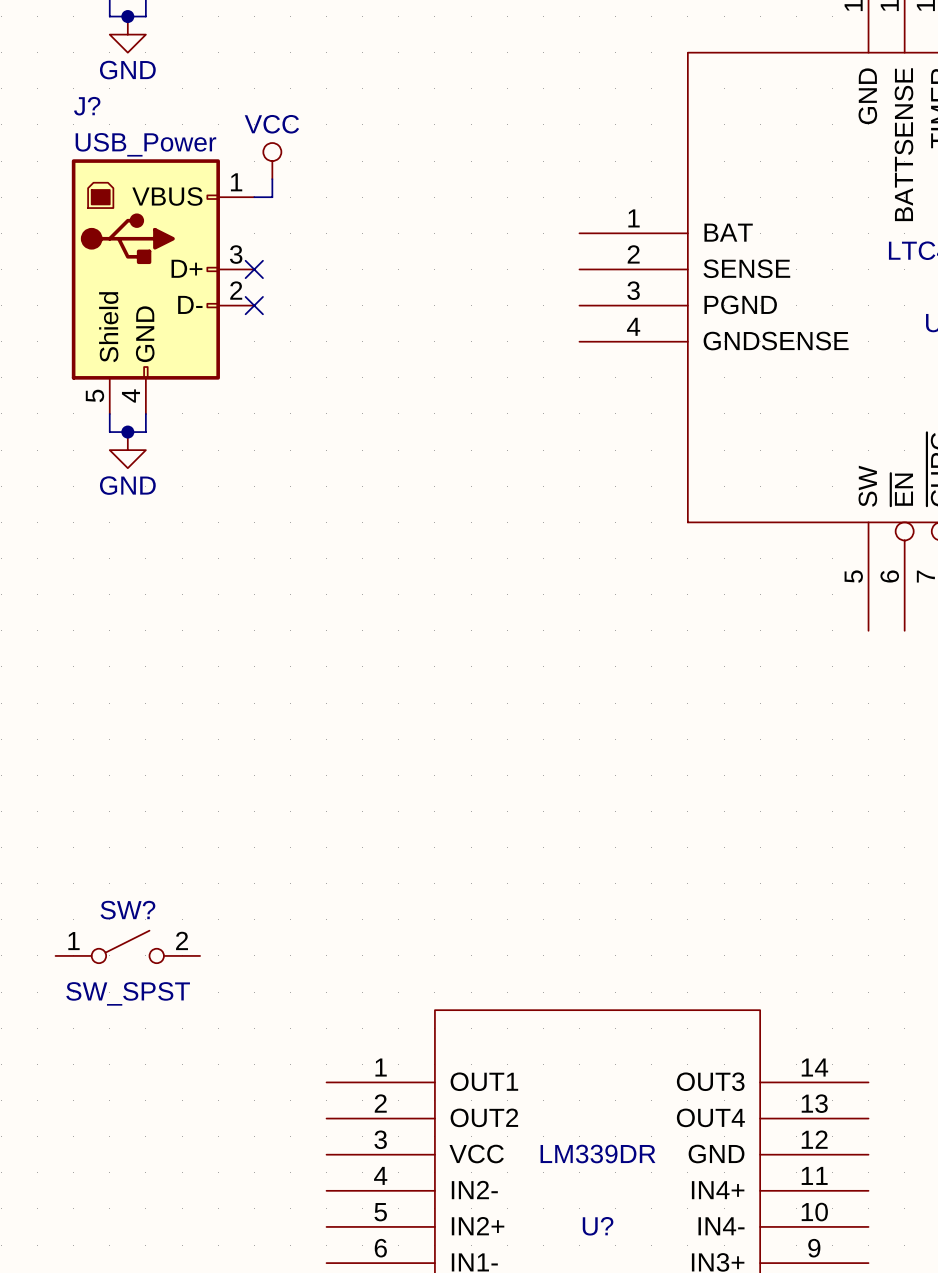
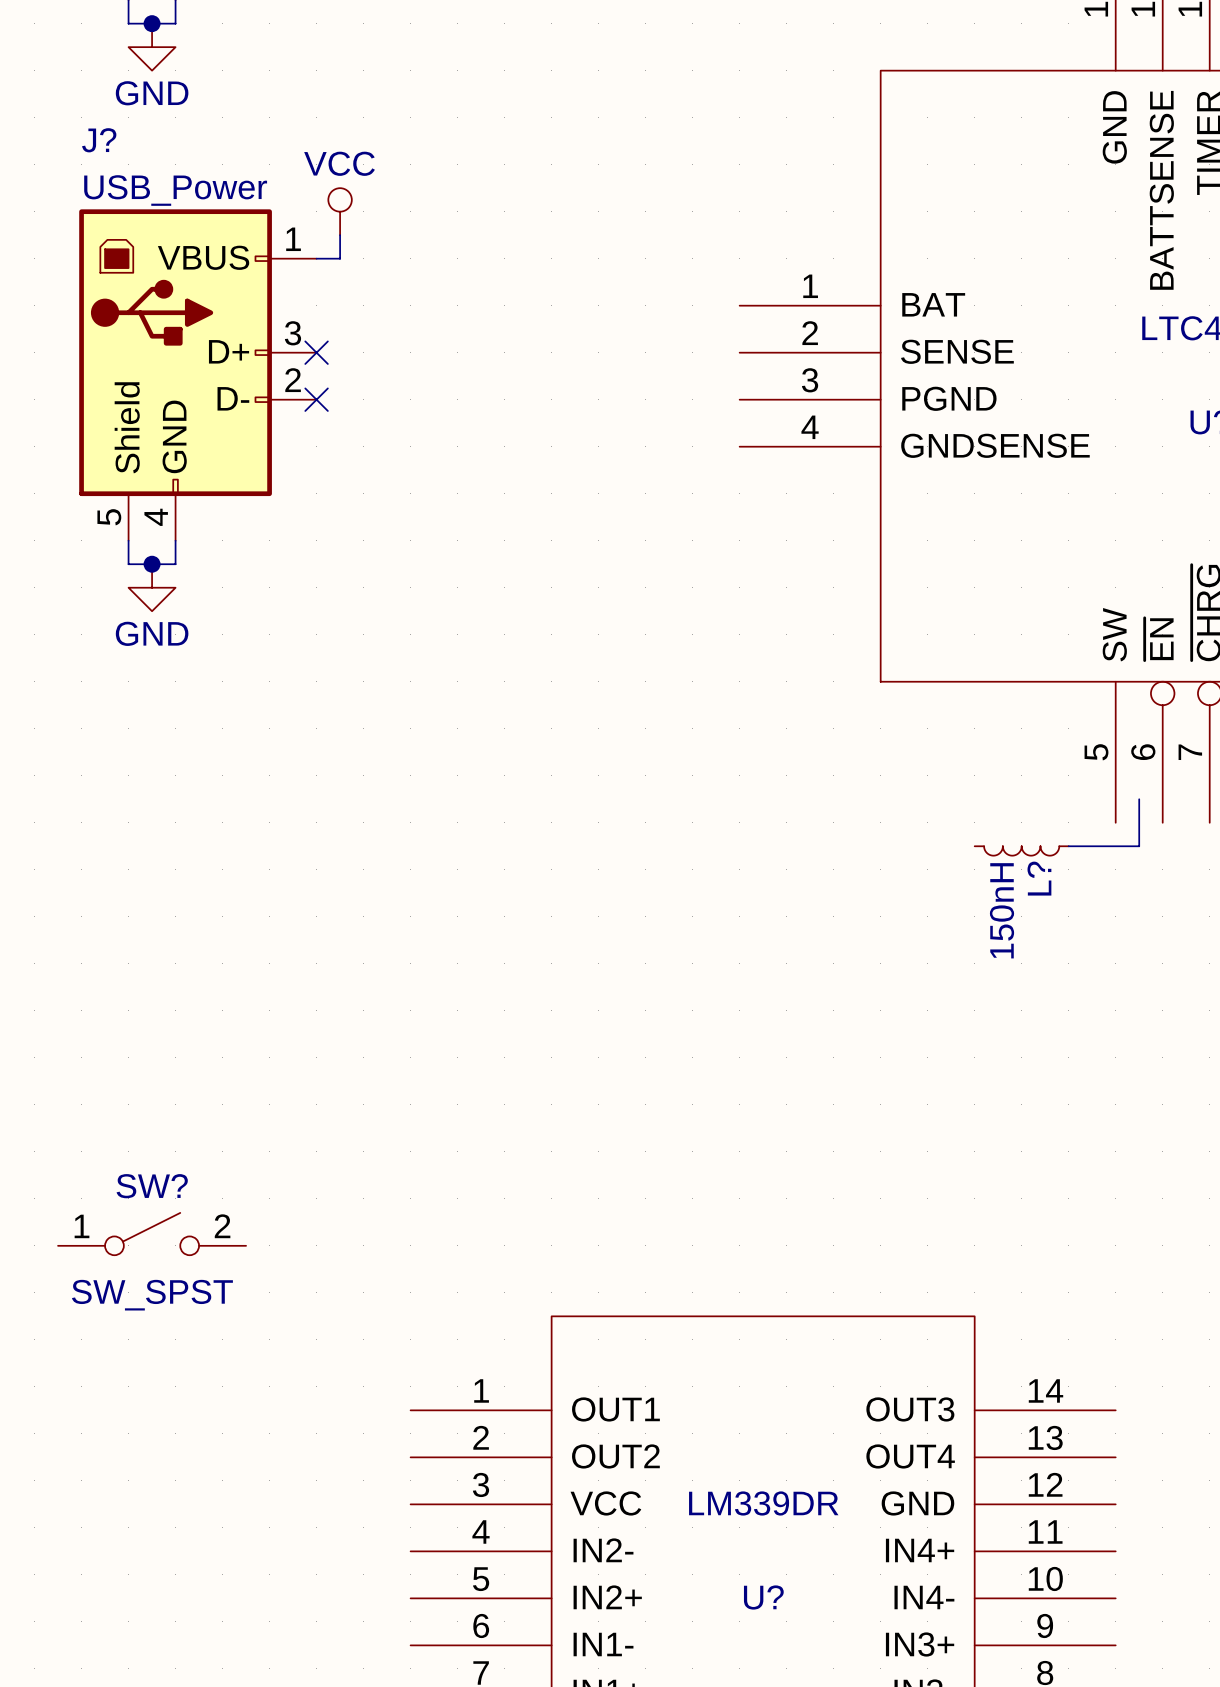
wire: none -> (1139, 799) (1139, 846) (1068, 846)
L?: none -> 150nH (1021, 850)

